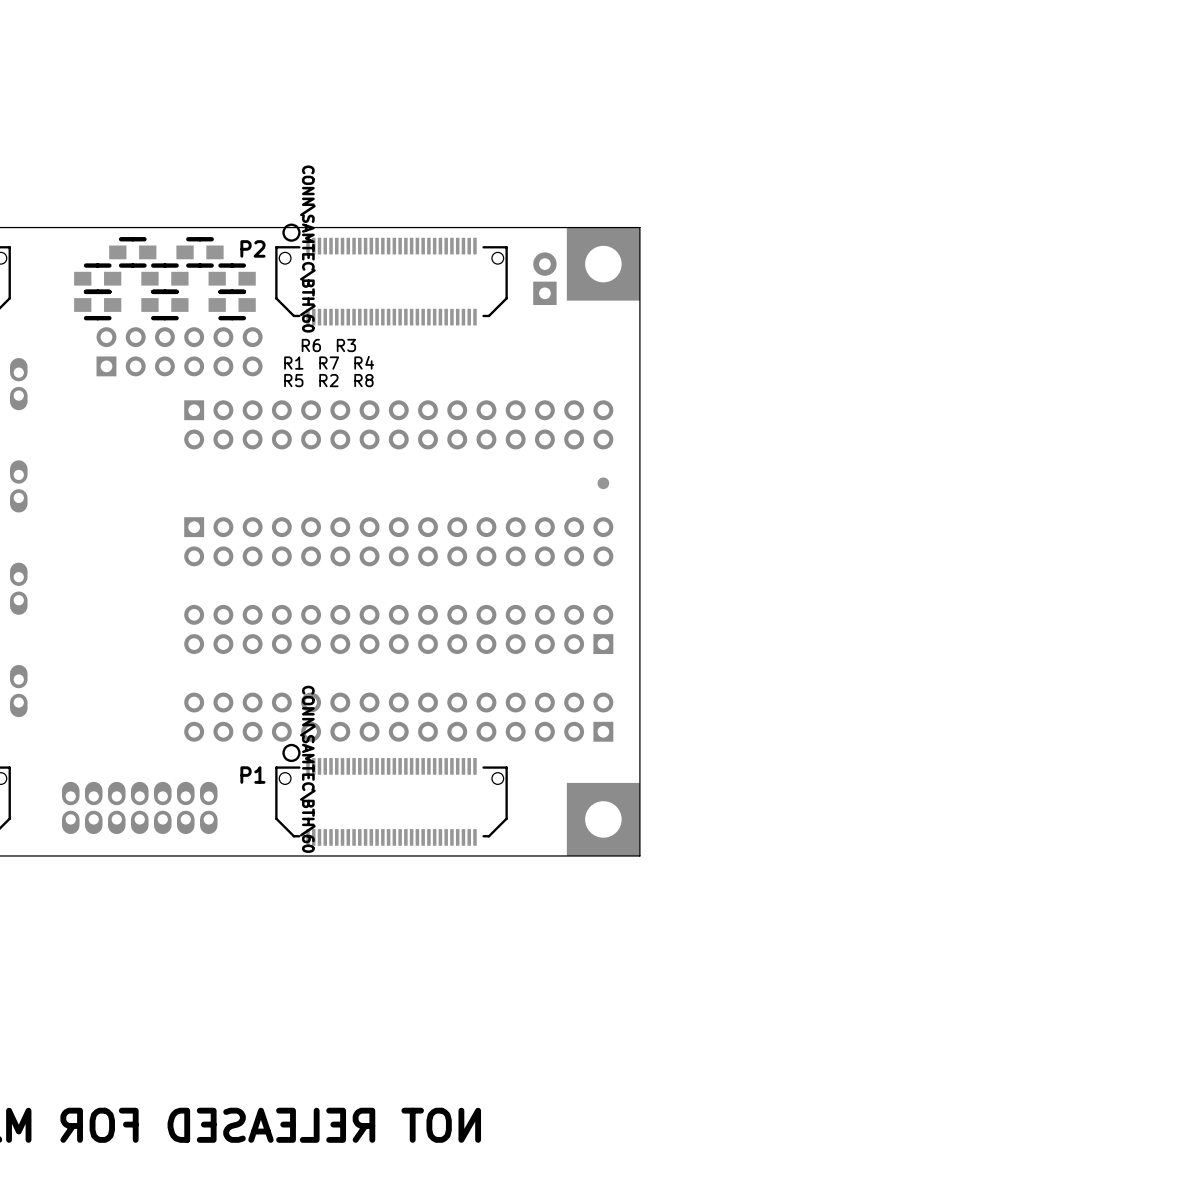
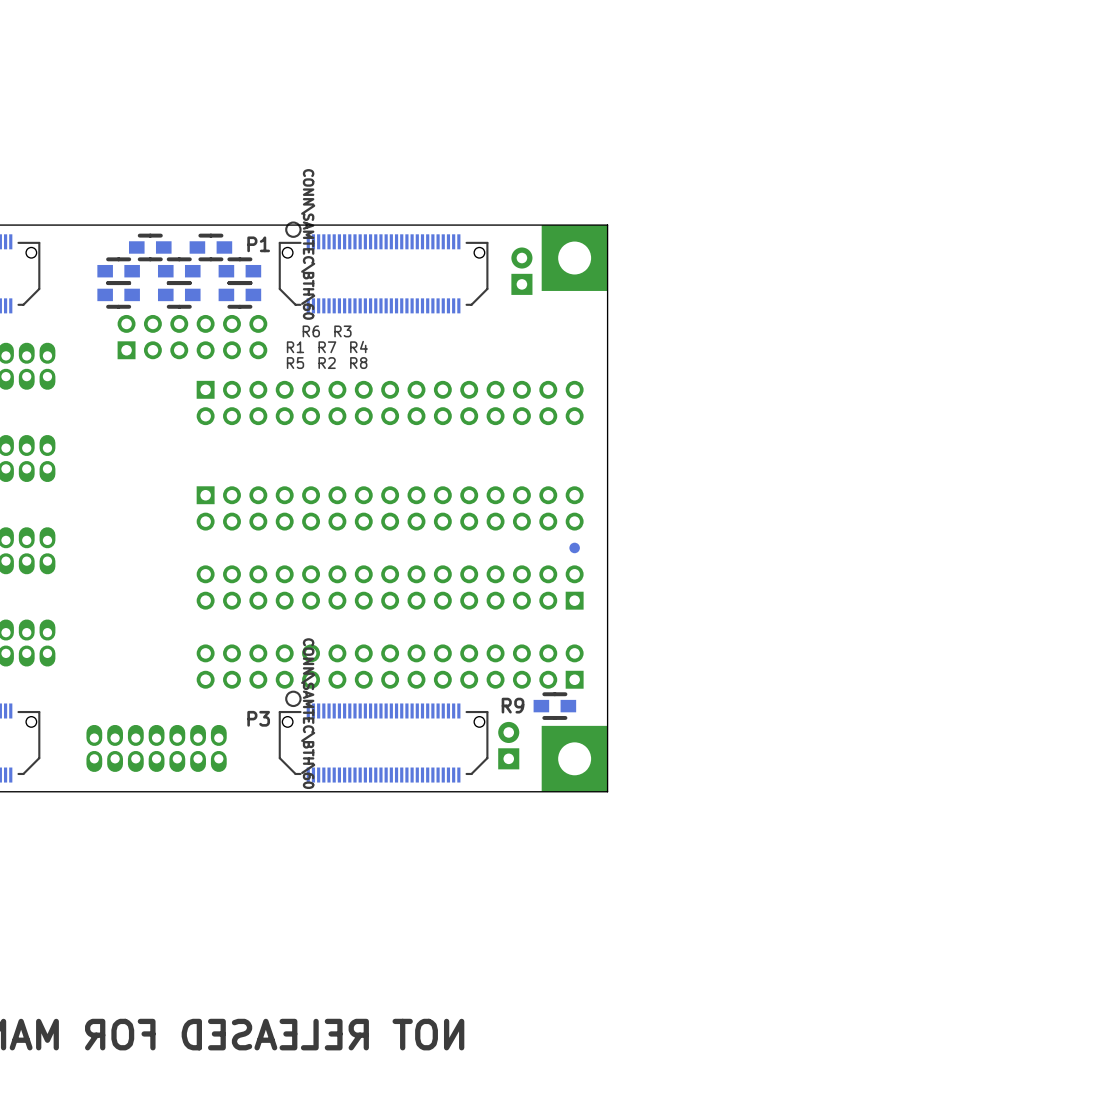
P2 name: P2 (252, 248) -> P1 (258, 244)
part position: (603, 483) -> (574, 547)
R9: none -> (554, 706)
P1 name: P1 (252, 775) -> P3 (258, 718)
part: none -> (508, 745)

